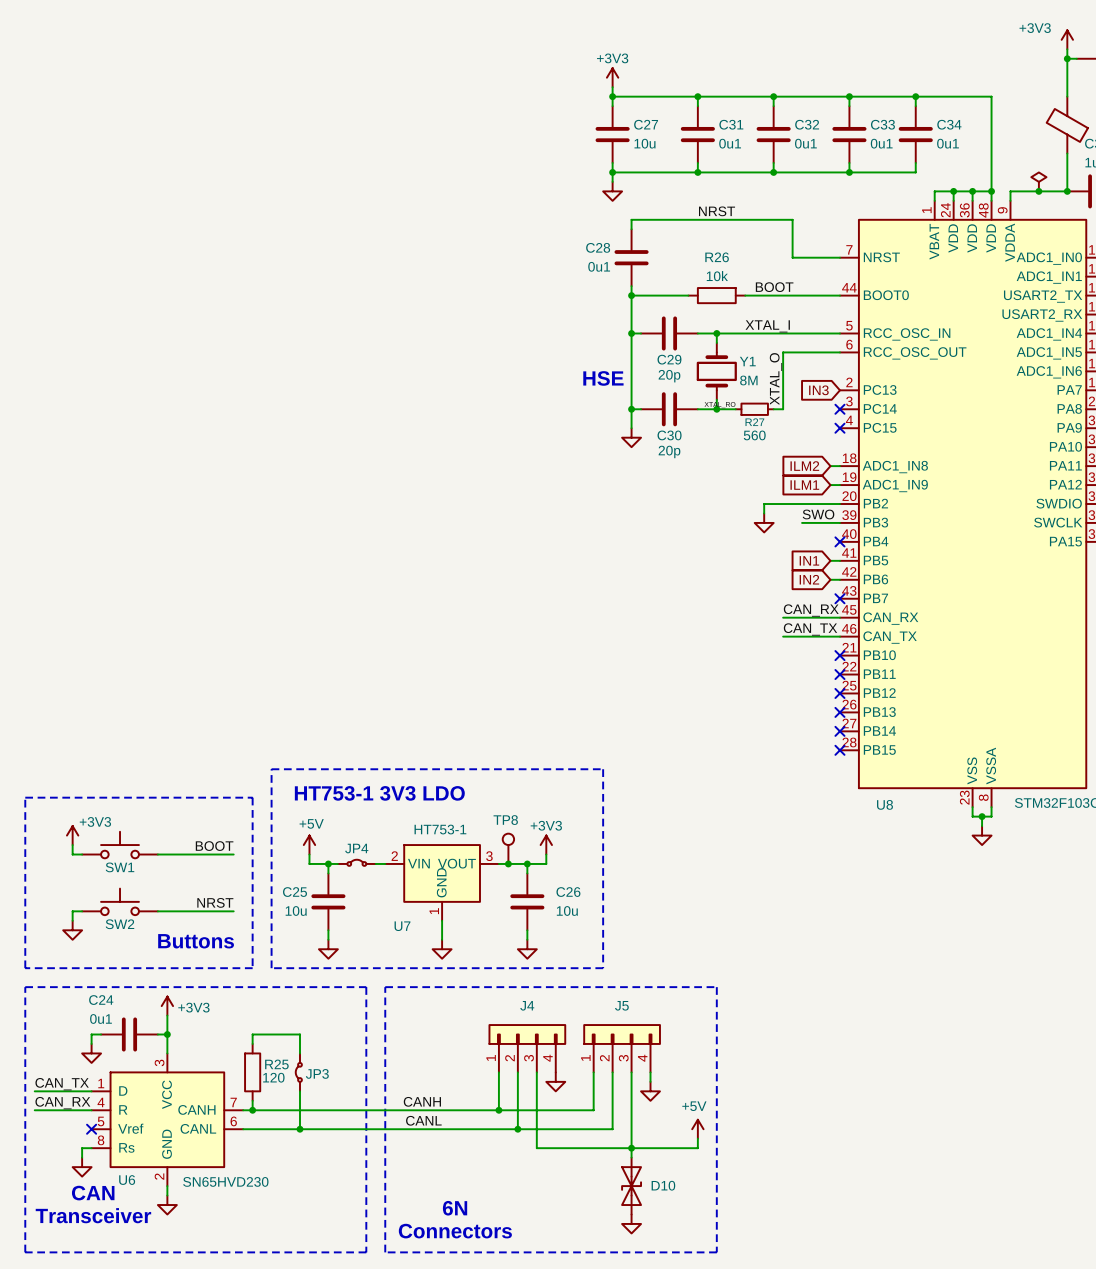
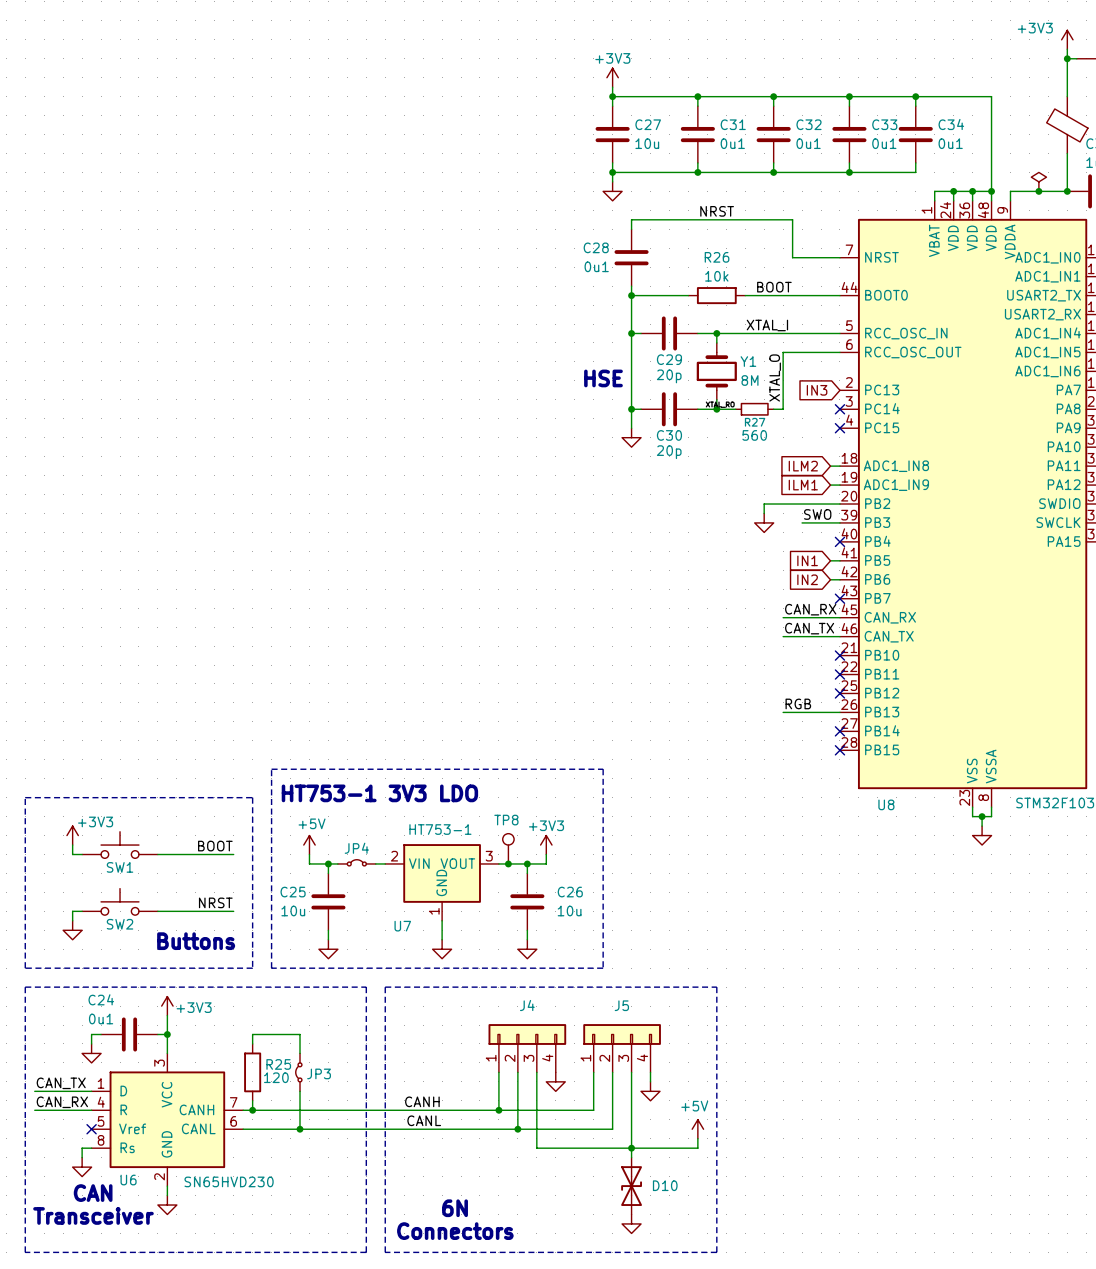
label: none -> RGB (798, 703)
wire: none -> (783, 712) (839, 712)
no-connect mark: (839, 712) -> none

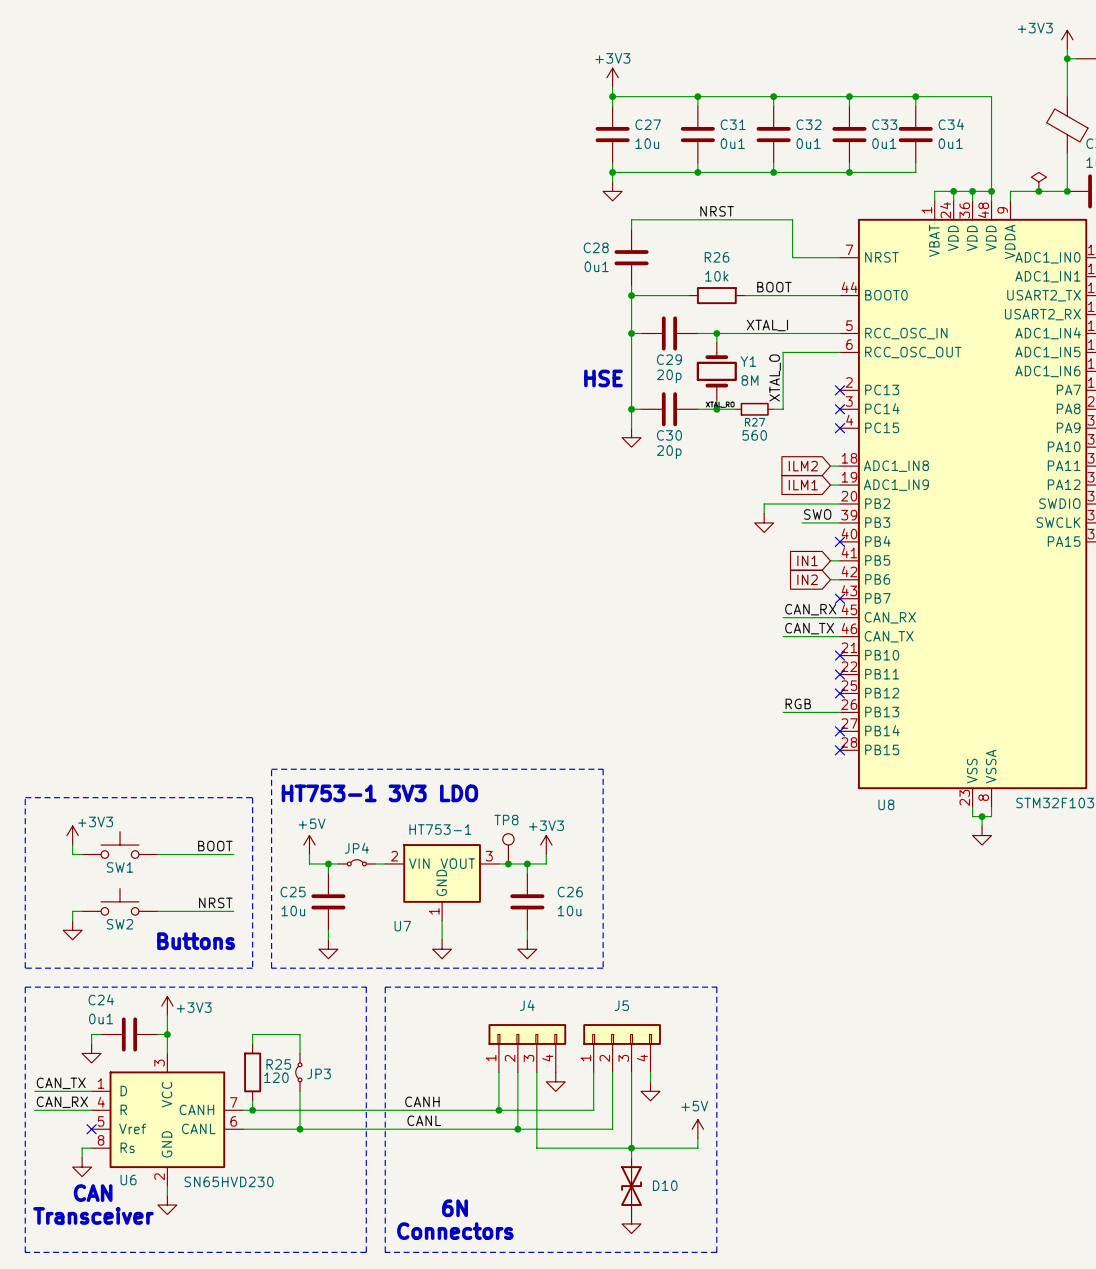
global label: IN3 (817, 390) -> none
no-connect mark: none -> (839, 390)

